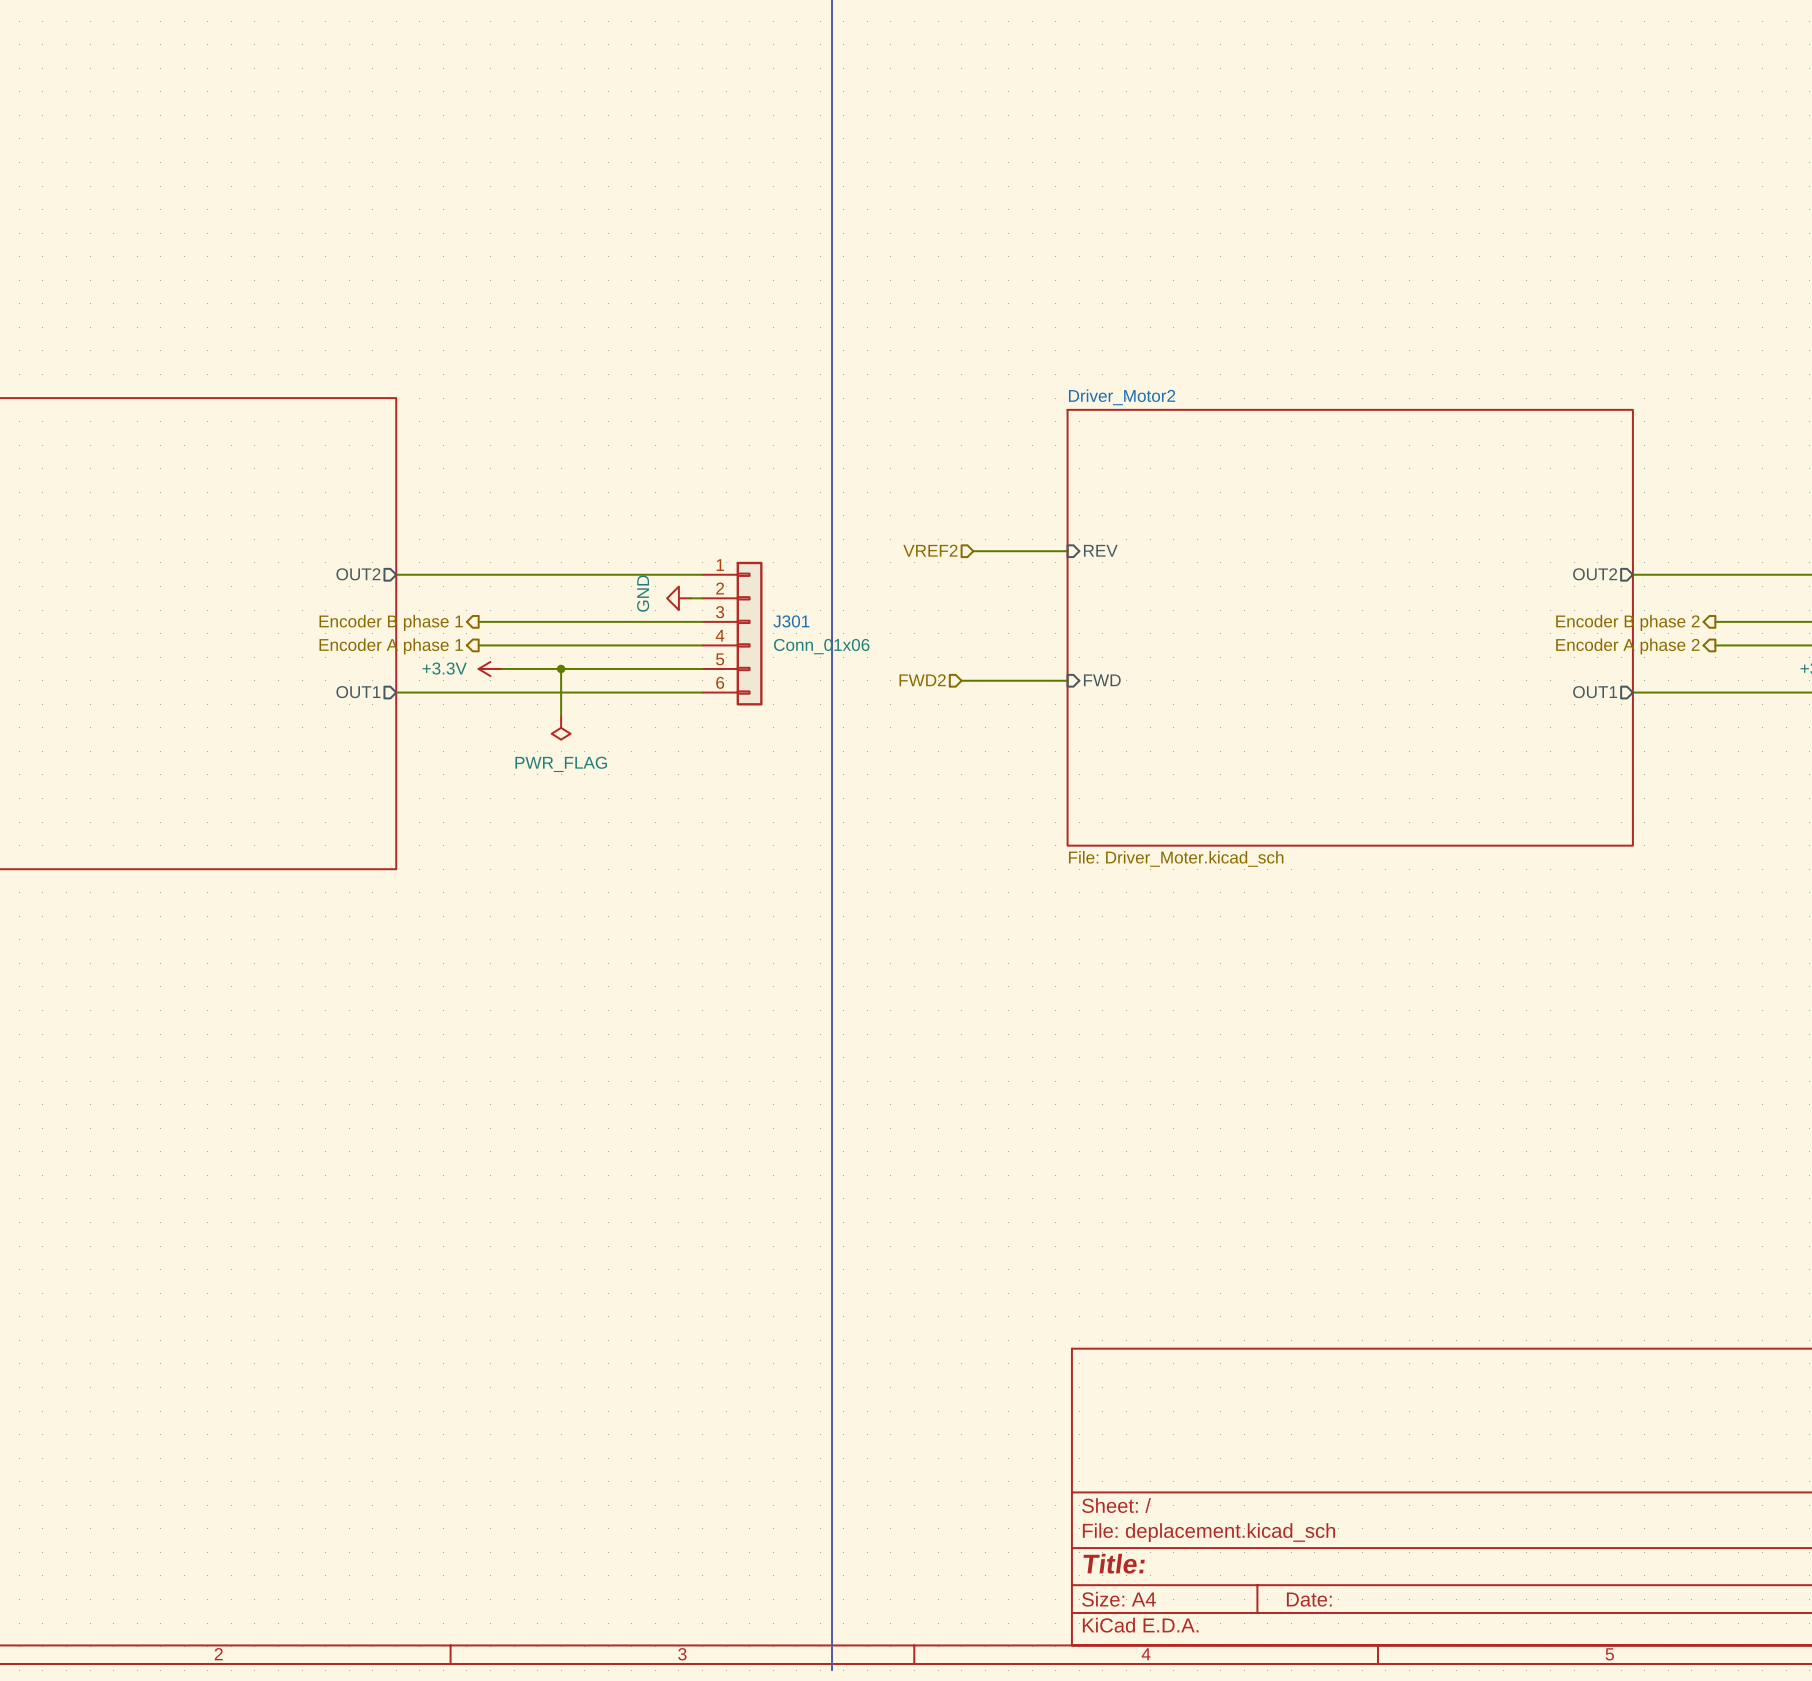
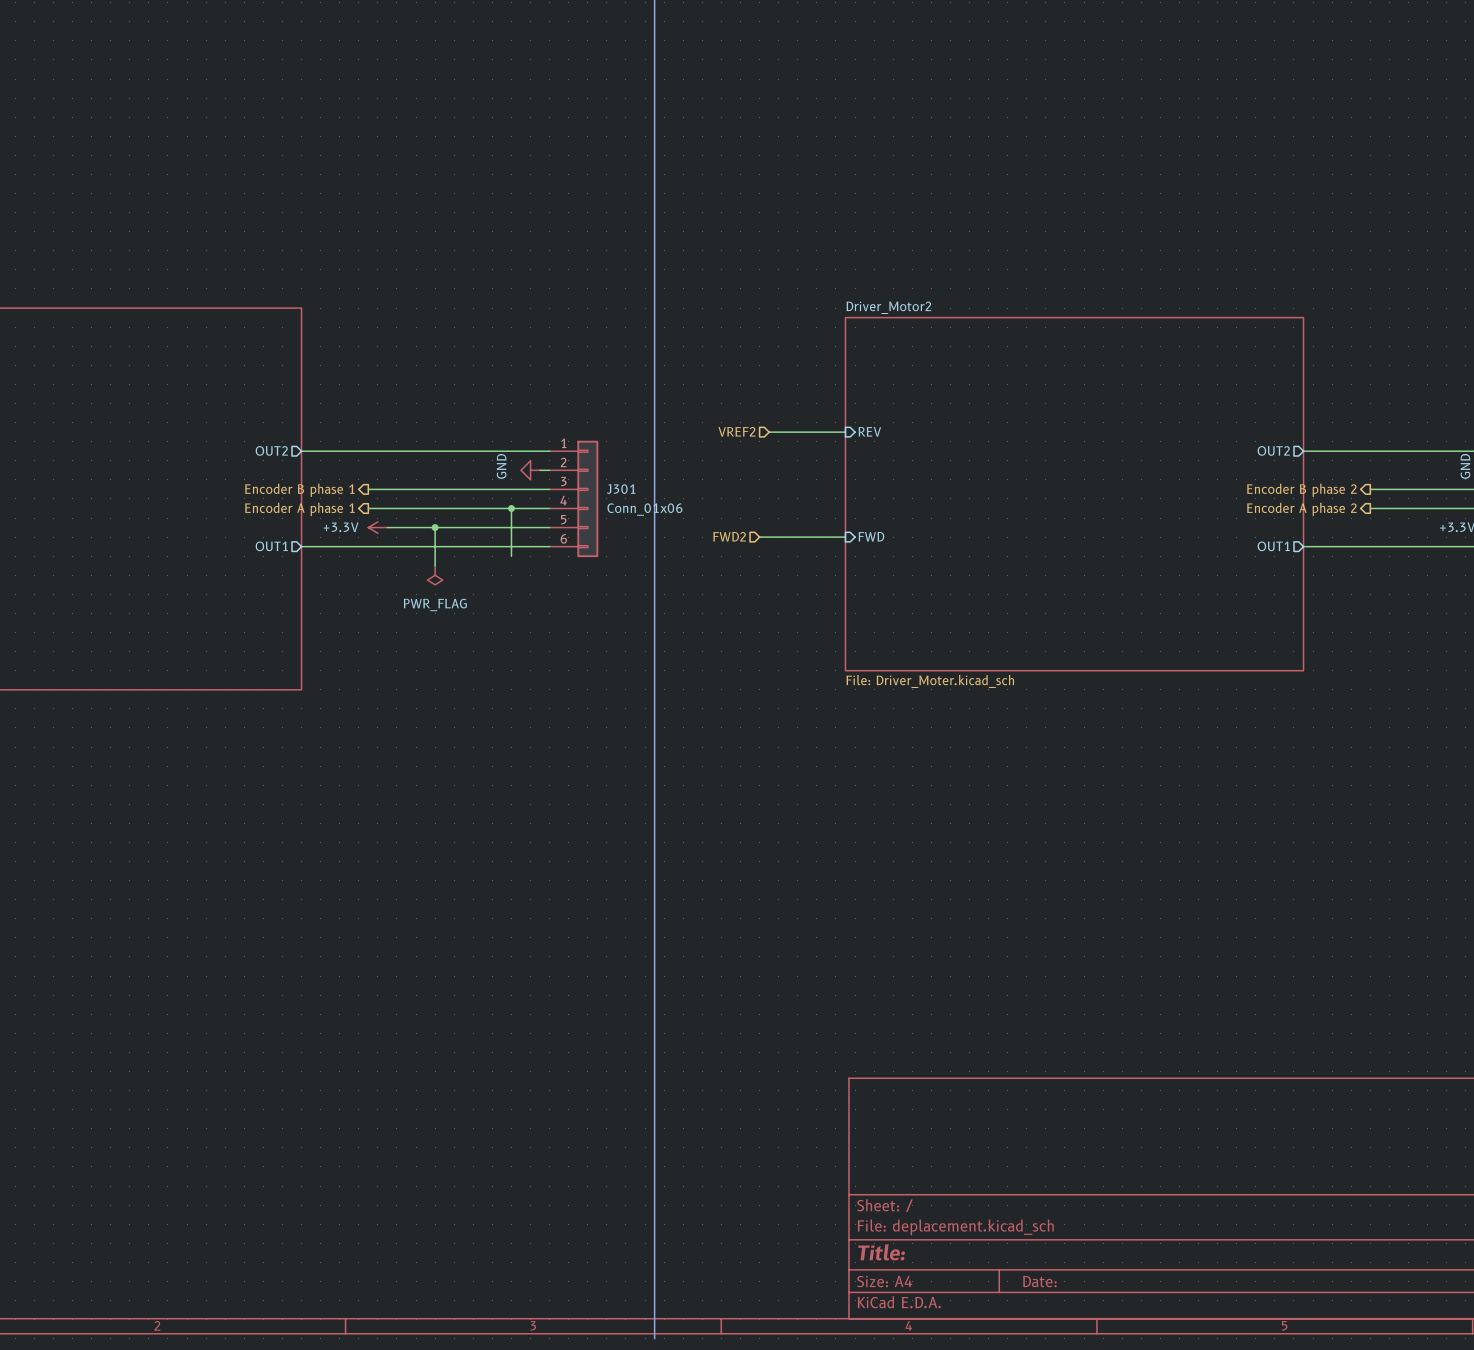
wire: none -> (511, 508) (511, 556)
junction: none -> (511, 508)

